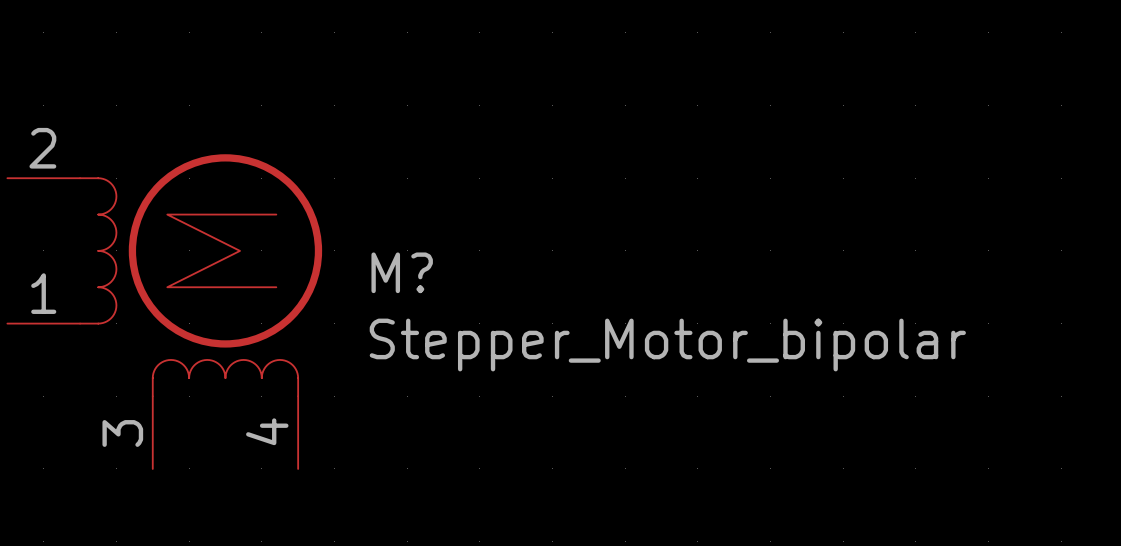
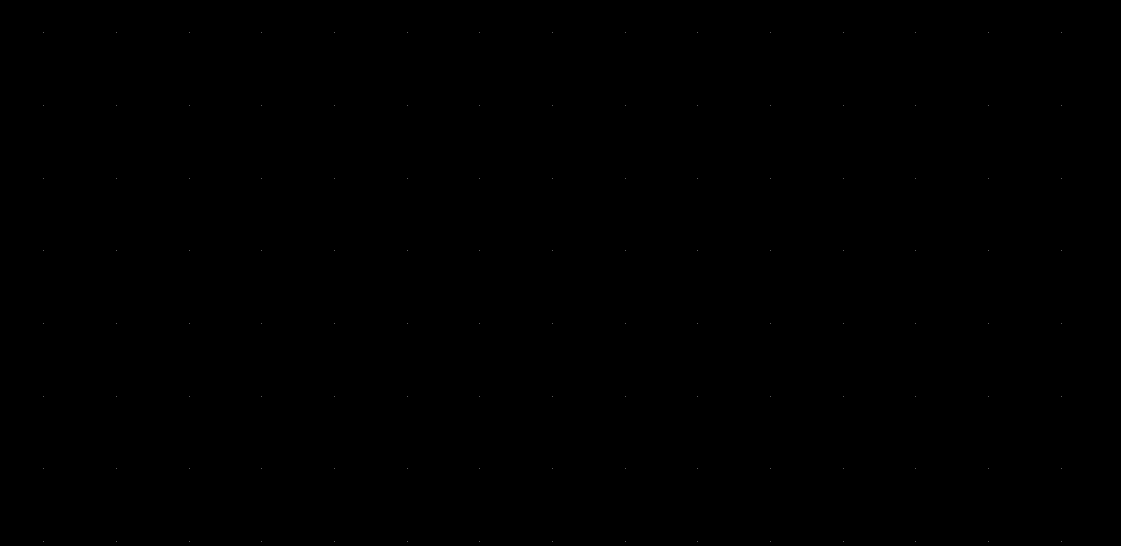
M?: Stepper_Motor_bipolar (164, 311) -> none

